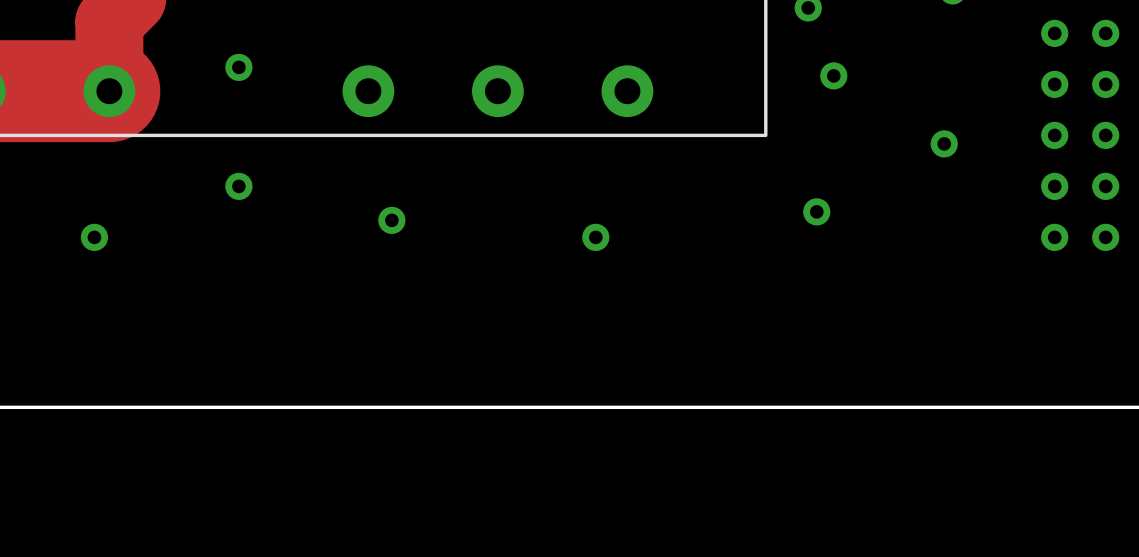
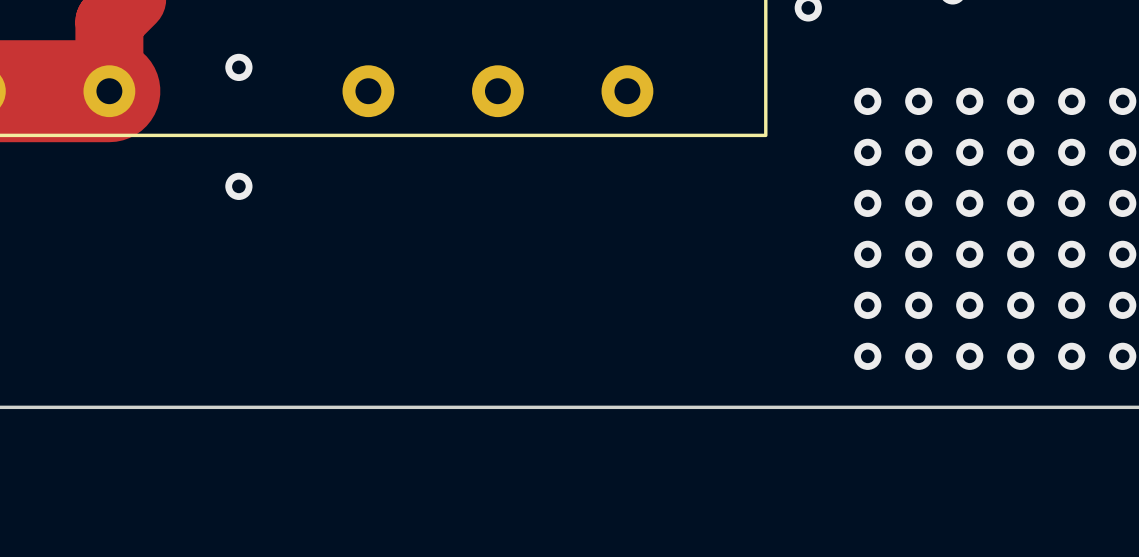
via: (1054, 33) -> none
via: (1105, 33) -> none
via: (833, 75) -> none
via position: (1054, 84) -> (1071, 101)
via position: (1105, 84) -> (1122, 101)
via: none -> (867, 101)
via: none -> (918, 101)
via: none -> (969, 101)
via: none -> (1020, 101)
via position: (1054, 135) -> (1071, 152)
via position: (1105, 135) -> (1122, 152)
via: (944, 143) -> none
via: none -> (867, 152)
via: none -> (918, 152)
via: none -> (969, 152)
via: none -> (1020, 152)
via position: (1054, 186) -> (1071, 203)
via position: (1105, 186) -> (1122, 203)
via: none -> (867, 203)
via: none -> (918, 203)
via: none -> (969, 203)
via: none -> (1020, 203)
via: (816, 211) -> none
via: (391, 220) -> none
via: (94, 237) -> none
via: (595, 237) -> none
via position: (1054, 237) -> (1071, 254)
via position: (1105, 237) -> (1122, 254)
via: none -> (867, 254)
via: none -> (918, 254)
via: none -> (969, 254)
via: none -> (1020, 254)
via: none -> (867, 305)
via: none -> (918, 305)
via: none -> (969, 305)
via: none -> (1020, 305)
via: none -> (1071, 305)
via: none -> (1122, 305)
via: none -> (867, 356)
via: none -> (918, 356)
via: none -> (969, 356)
via: none -> (1020, 356)
via: none -> (1071, 356)
via: none -> (1122, 356)

